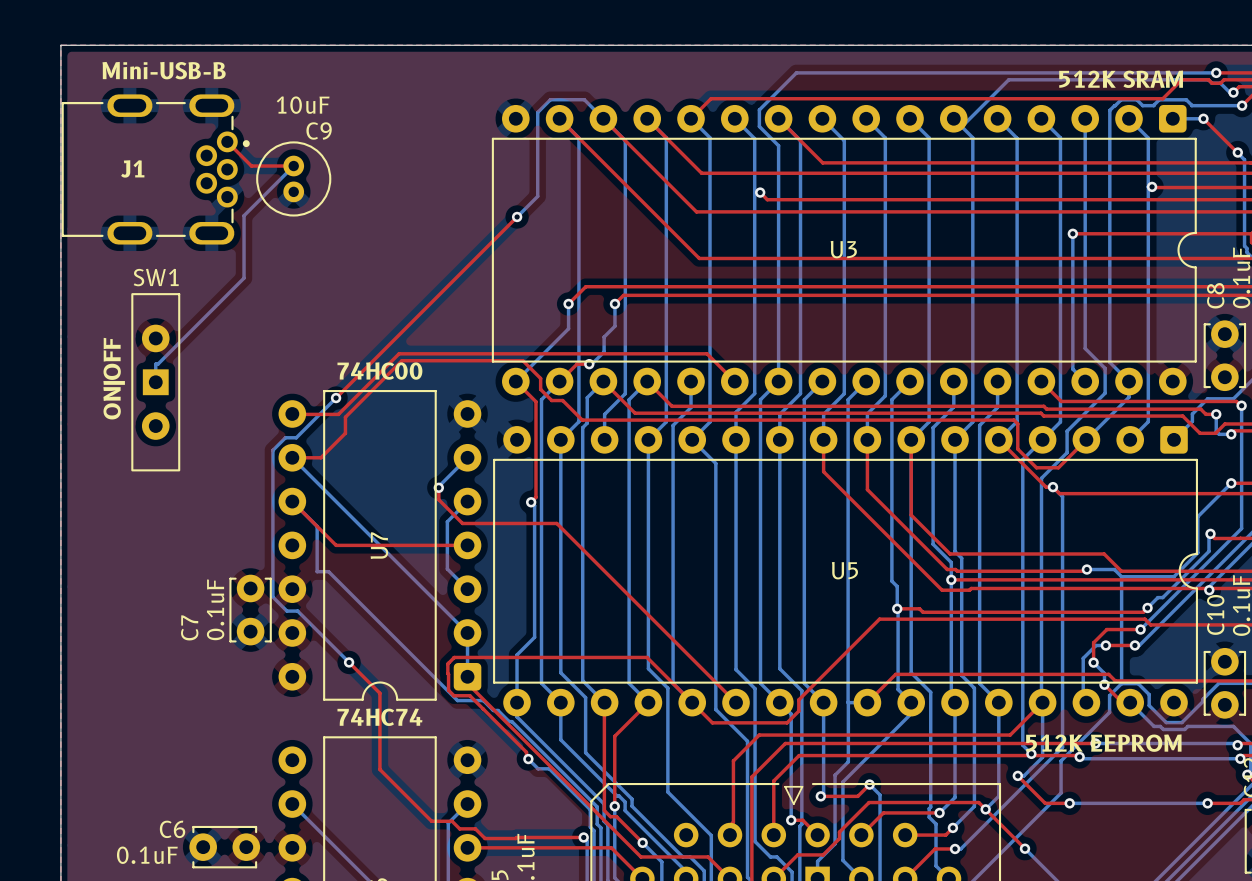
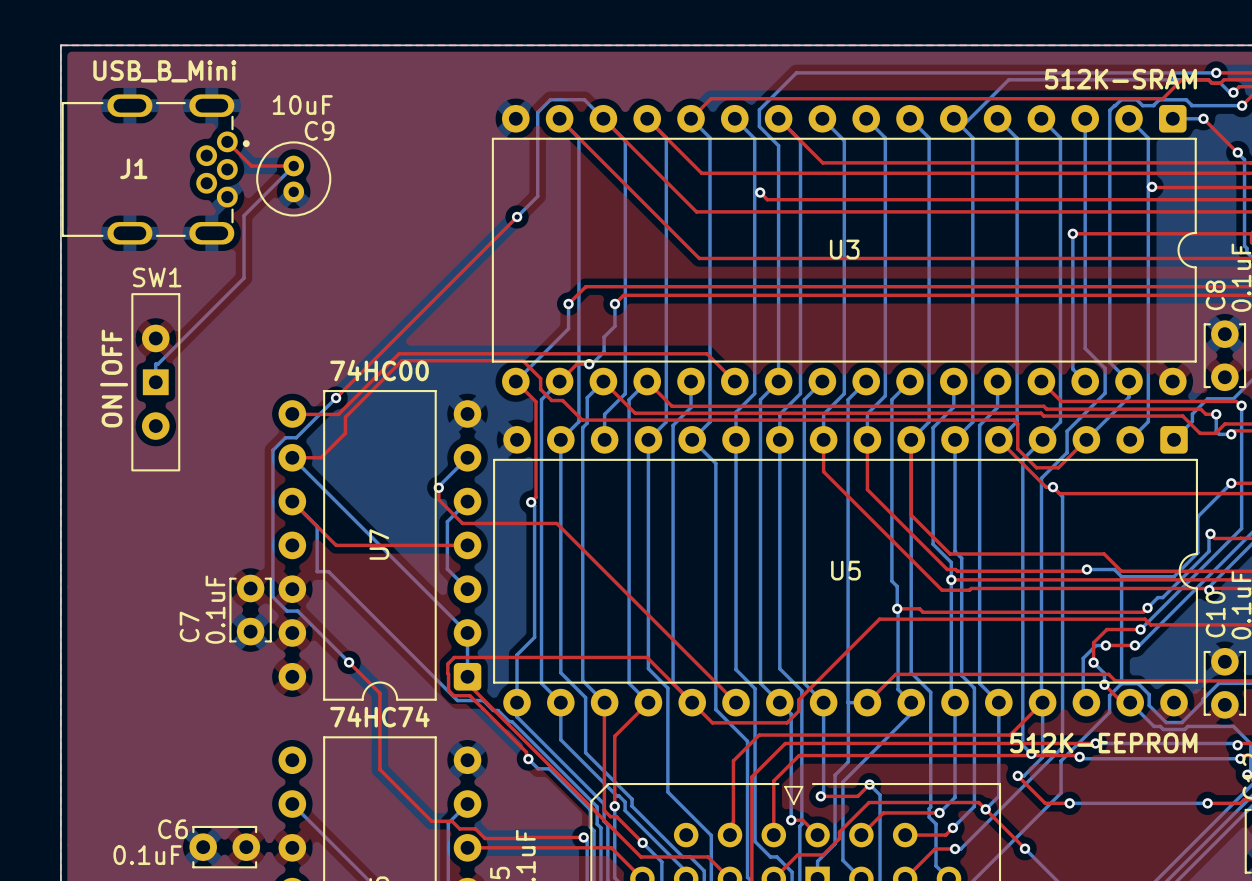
J1 value: Mini-USB-B (164, 70) -> USB_B_Mini (164, 71)
U3 value: 512K SRAM (1121, 79) -> 512K-SRAM (1121, 79)
U5 value: 512K EEPROM (1103, 743) -> 512K-EEPROM (1103, 743)

